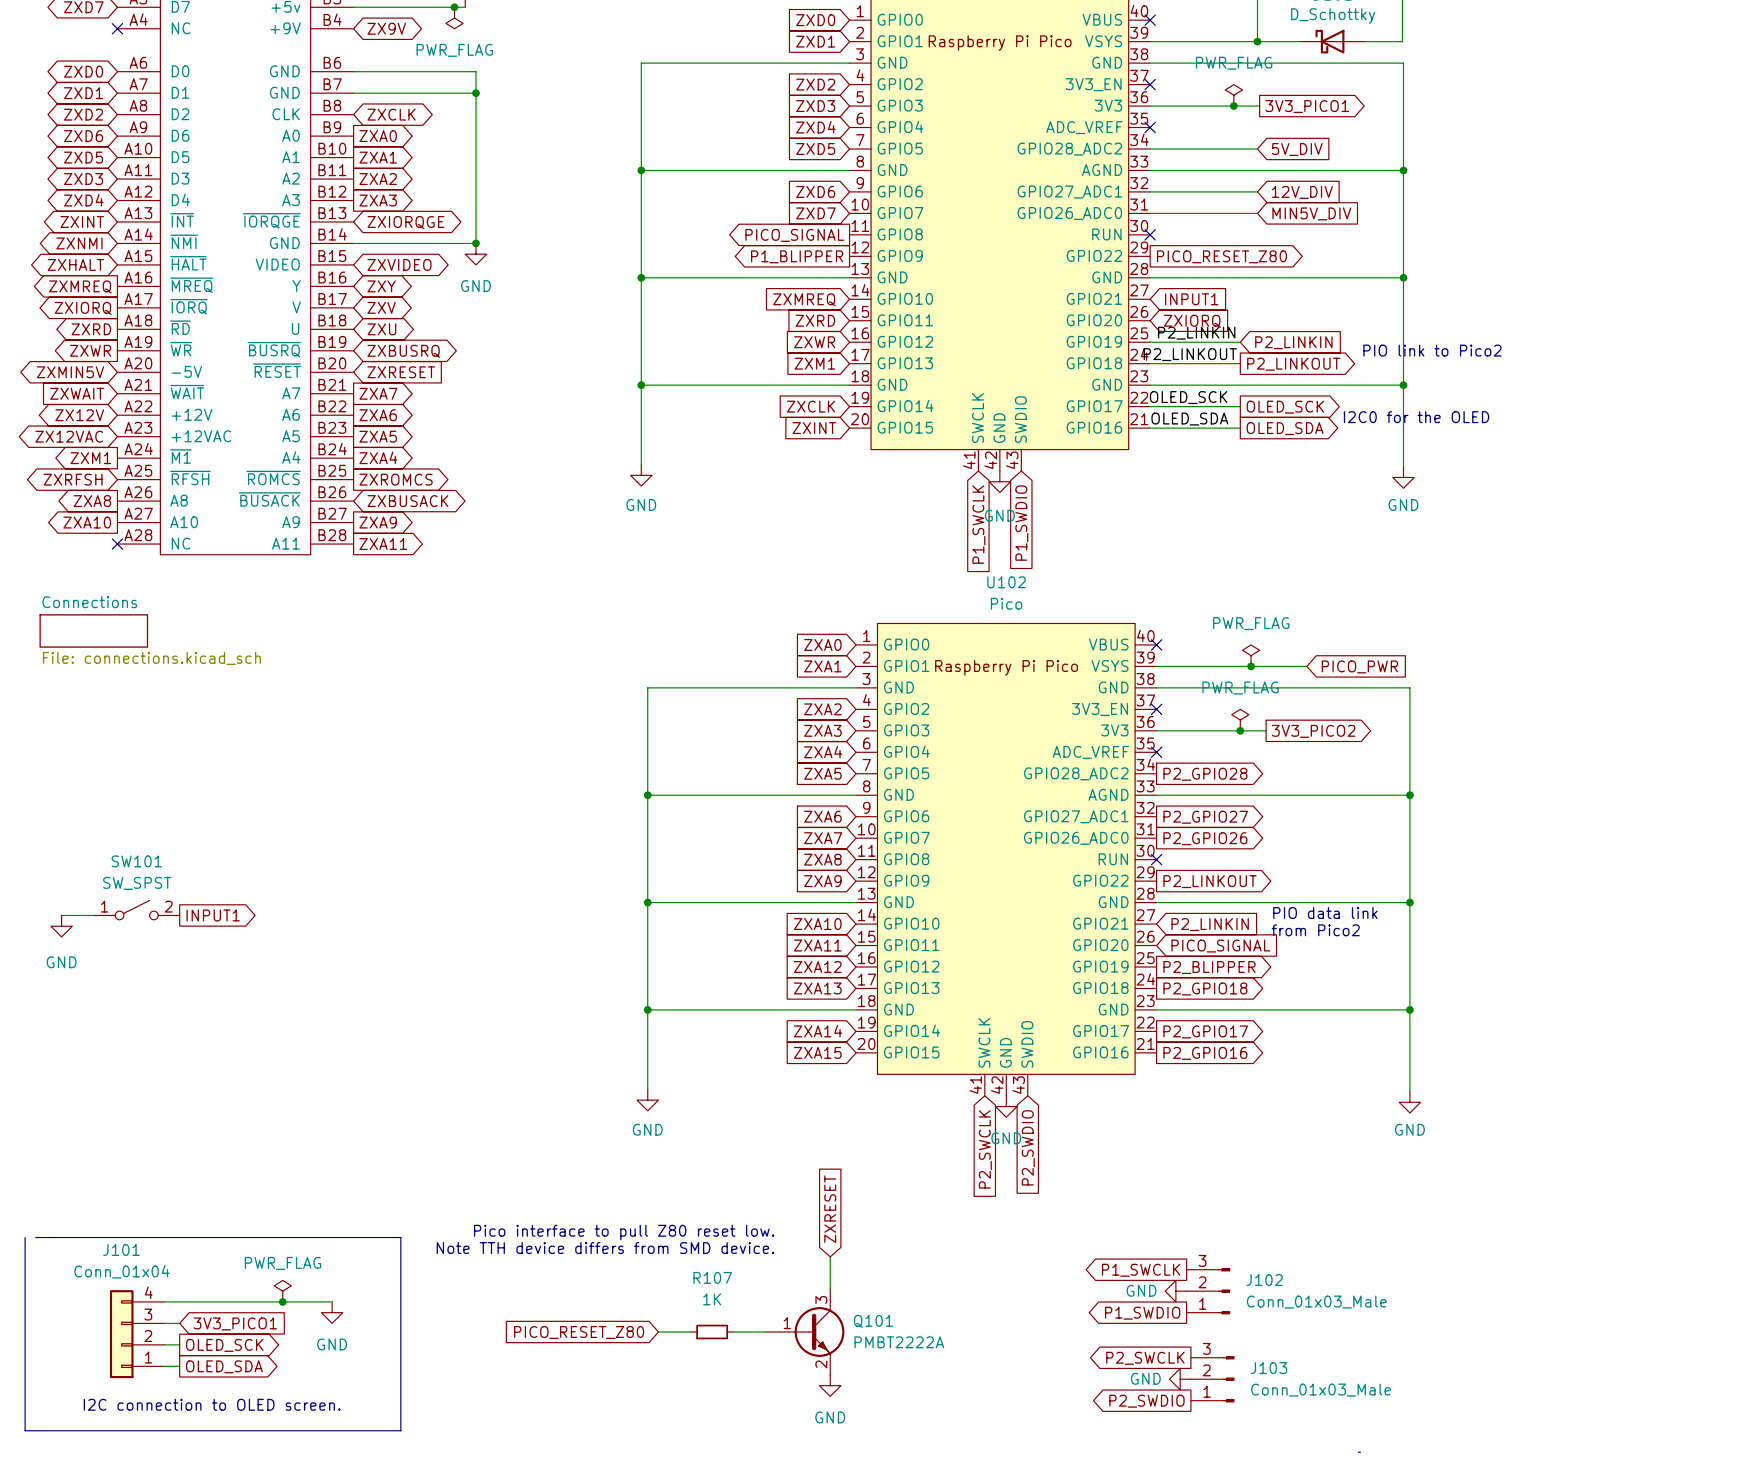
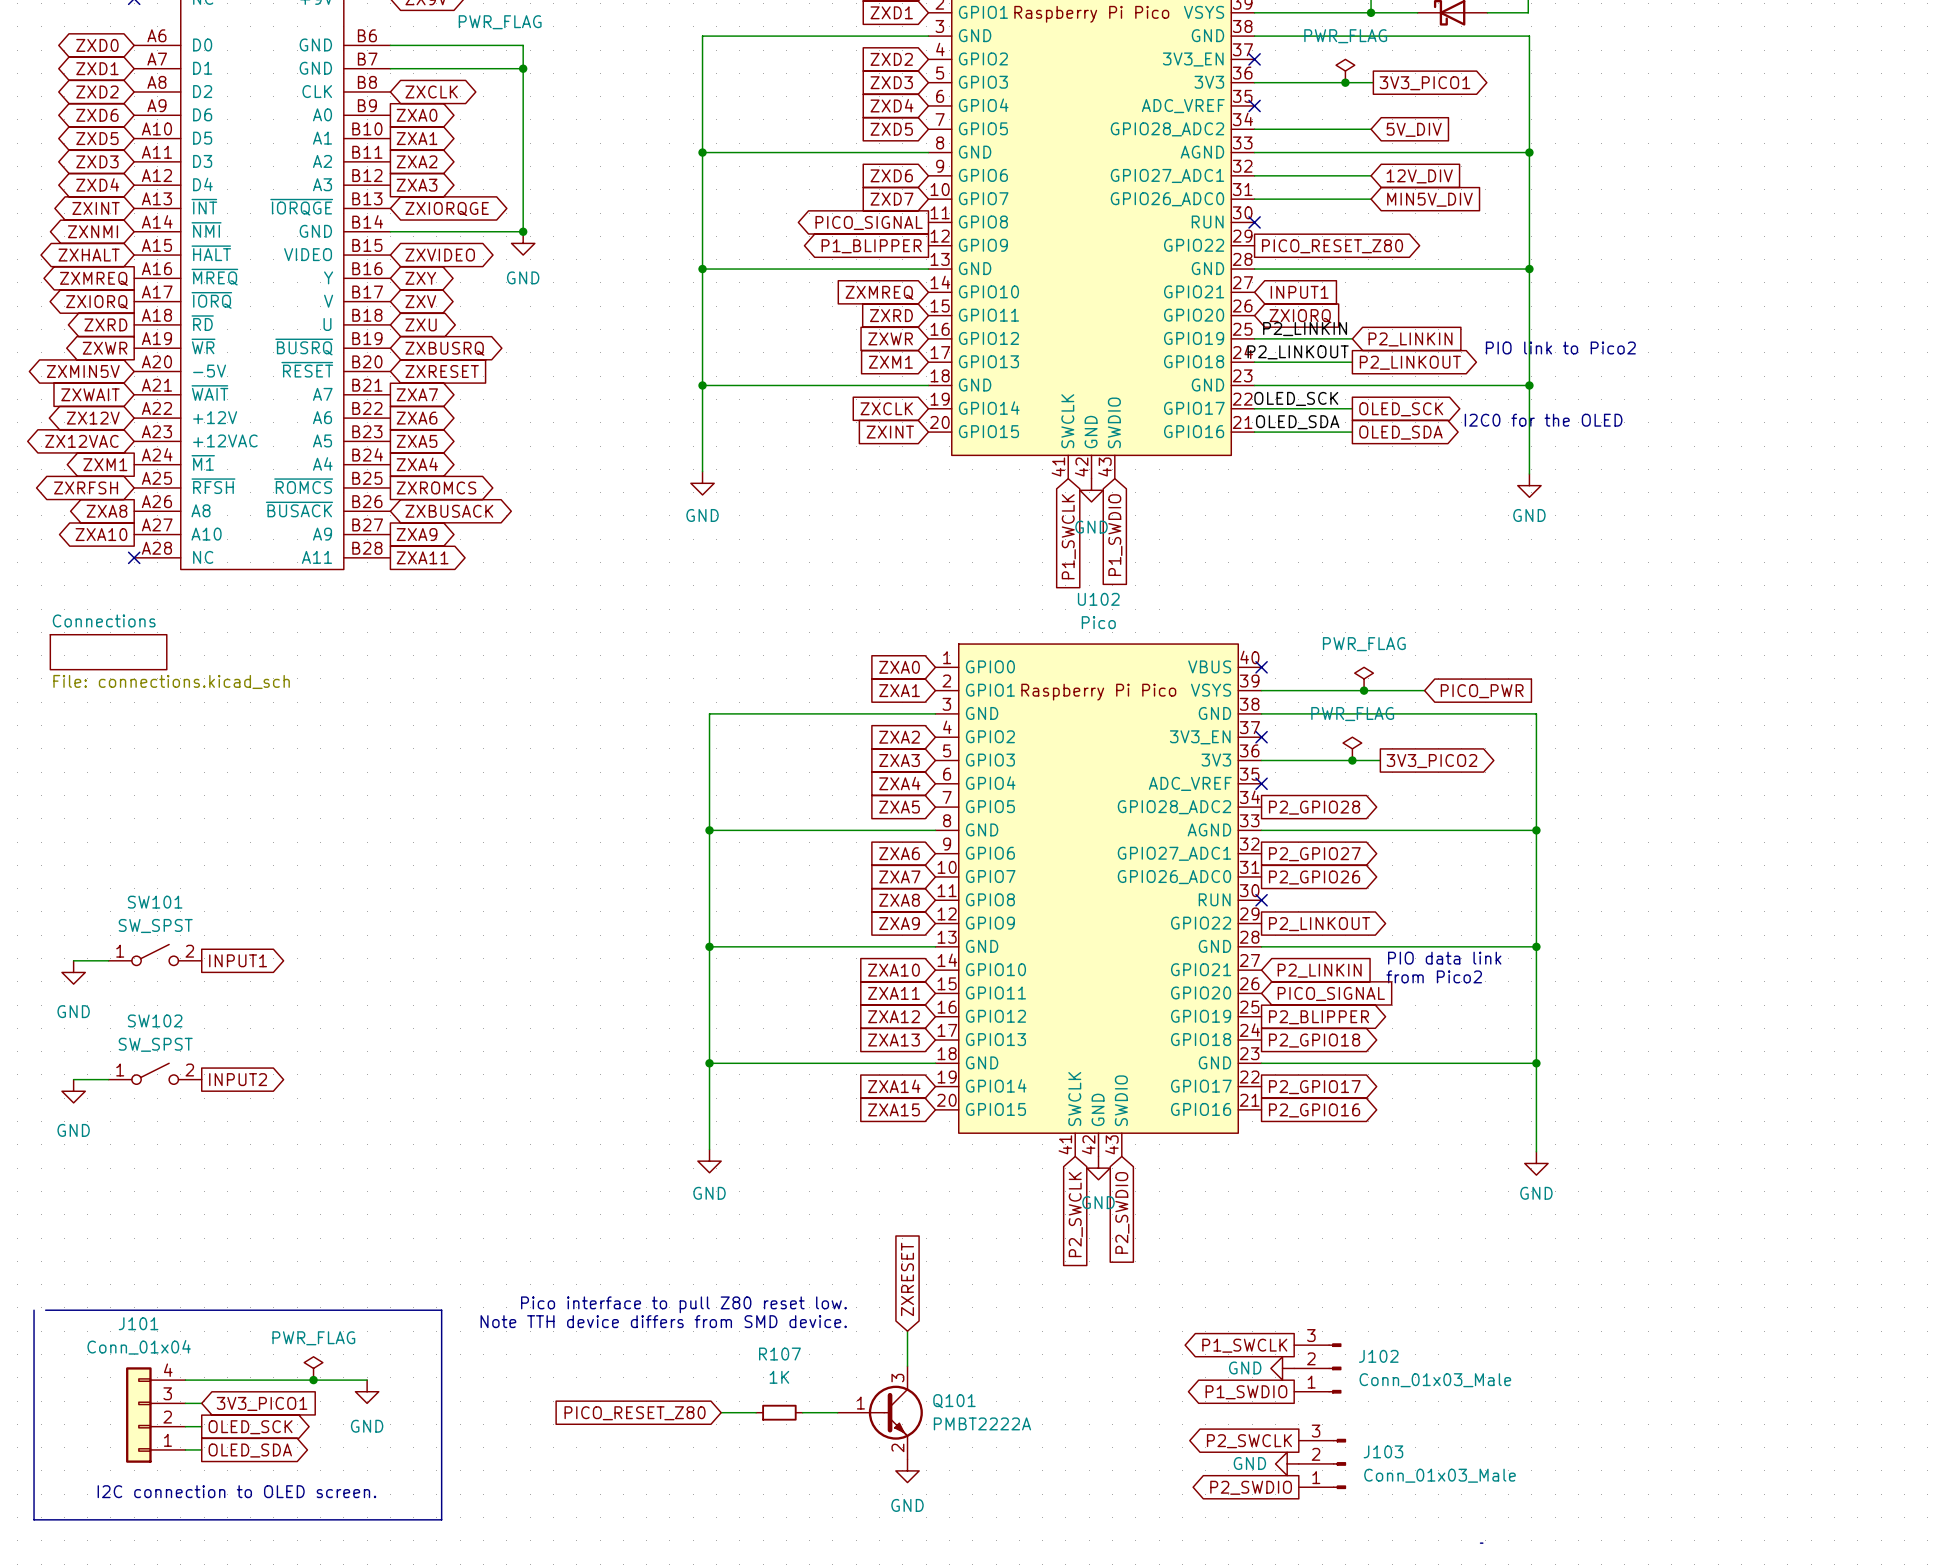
SW102: none -> SW_SPST (155, 1073)
wire: none -> (73, 1079) (108, 1079)
global label: none -> INPUT2 (238, 1079)
power symbol: none -> GND (73, 1091)

